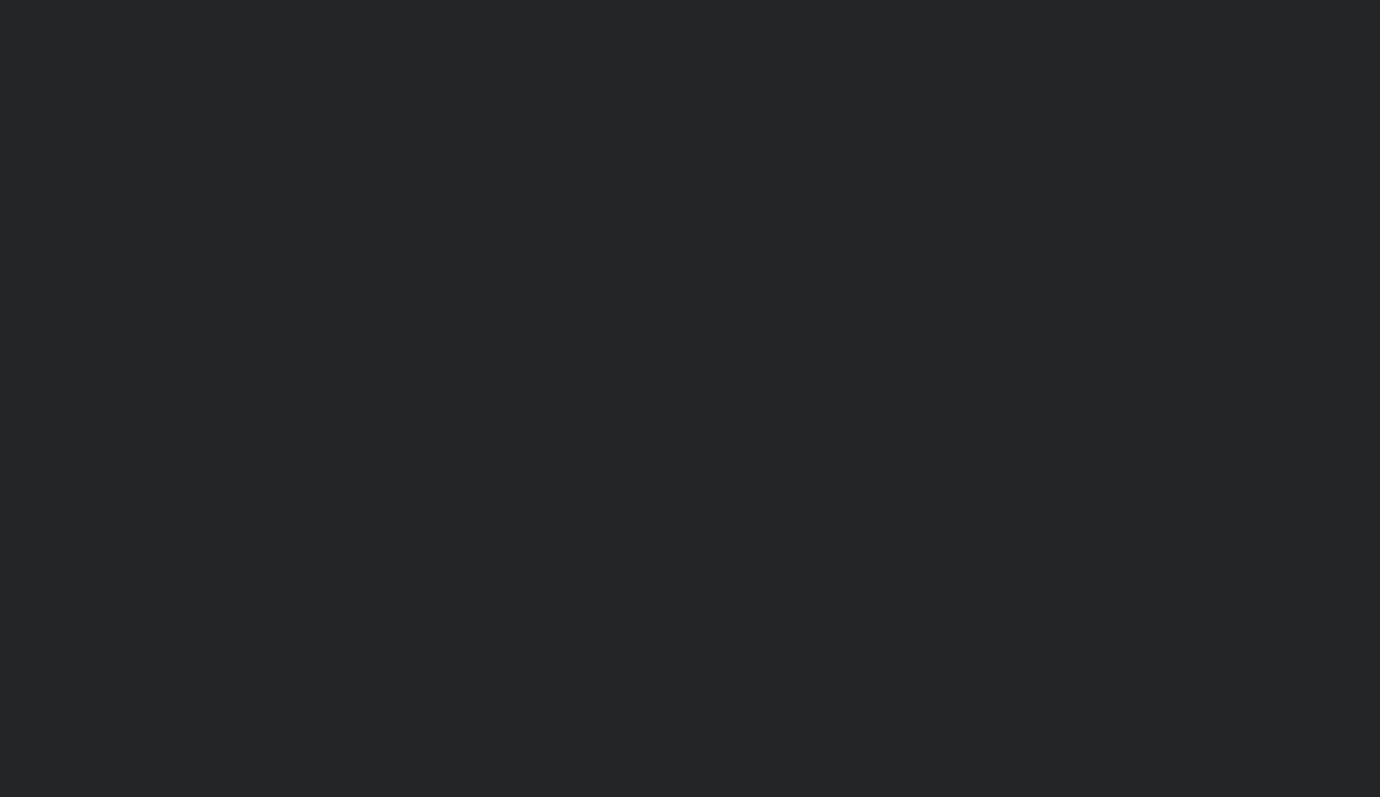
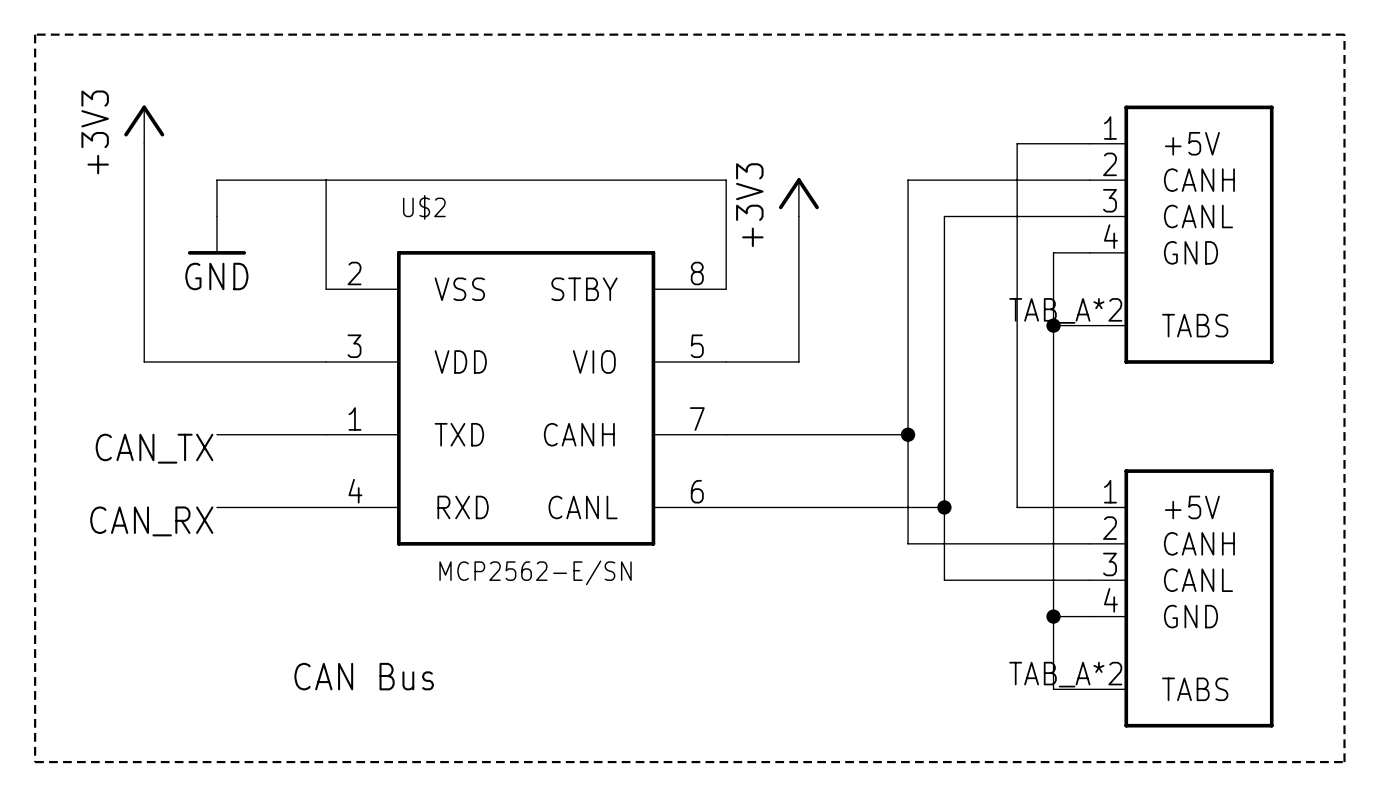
line: none -> (35, 34) (35, 762) (1344, 762) (1344, 34) (35, 34)
power symbol: none -> +3V3 (144, 124)
wire: none -> (144, 143) (144, 361) (326, 361)
wire: none -> (1089, 143) (1017, 143) (1017, 507) (1089, 507)
wire: none -> (326, 180) (326, 289)
wire: none -> (1089, 180) (908, 180) (908, 543) (1089, 543)
power symbol: none -> +3V3 (798, 197)
wire: none -> (216, 216) (216, 180) (726, 180) (726, 289)
wire: none -> (798, 216) (798, 361) (726, 361)
wire: none -> (1089, 216) (944, 216) (944, 580) (1089, 580)
part: none -> (1181, 234)
power symbol: none -> GND (216, 235)
wire: none -> (1089, 252) (1053, 252) (1053, 689) (1126, 689)
wire: none -> (1053, 325) (1126, 325)
junction: none -> (1053, 325)
U$2: none -> MCP2562-E/SN (526, 398)
wire: none -> (216, 434) (326, 434)
wire: none -> (726, 434) (908, 434)
junction: none -> (908, 434)
label: none -> CAN_TX (154, 448)
wire: none -> (216, 507) (326, 507)
wire: none -> (726, 507) (944, 507)
junction: none -> (944, 507)
label: none -> CAN_RX (151, 521)
part: none -> (1181, 598)
wire: none -> (1053, 616) (1089, 616)
junction: none -> (1053, 616)
text: none -> CAN Bus (364, 676)

